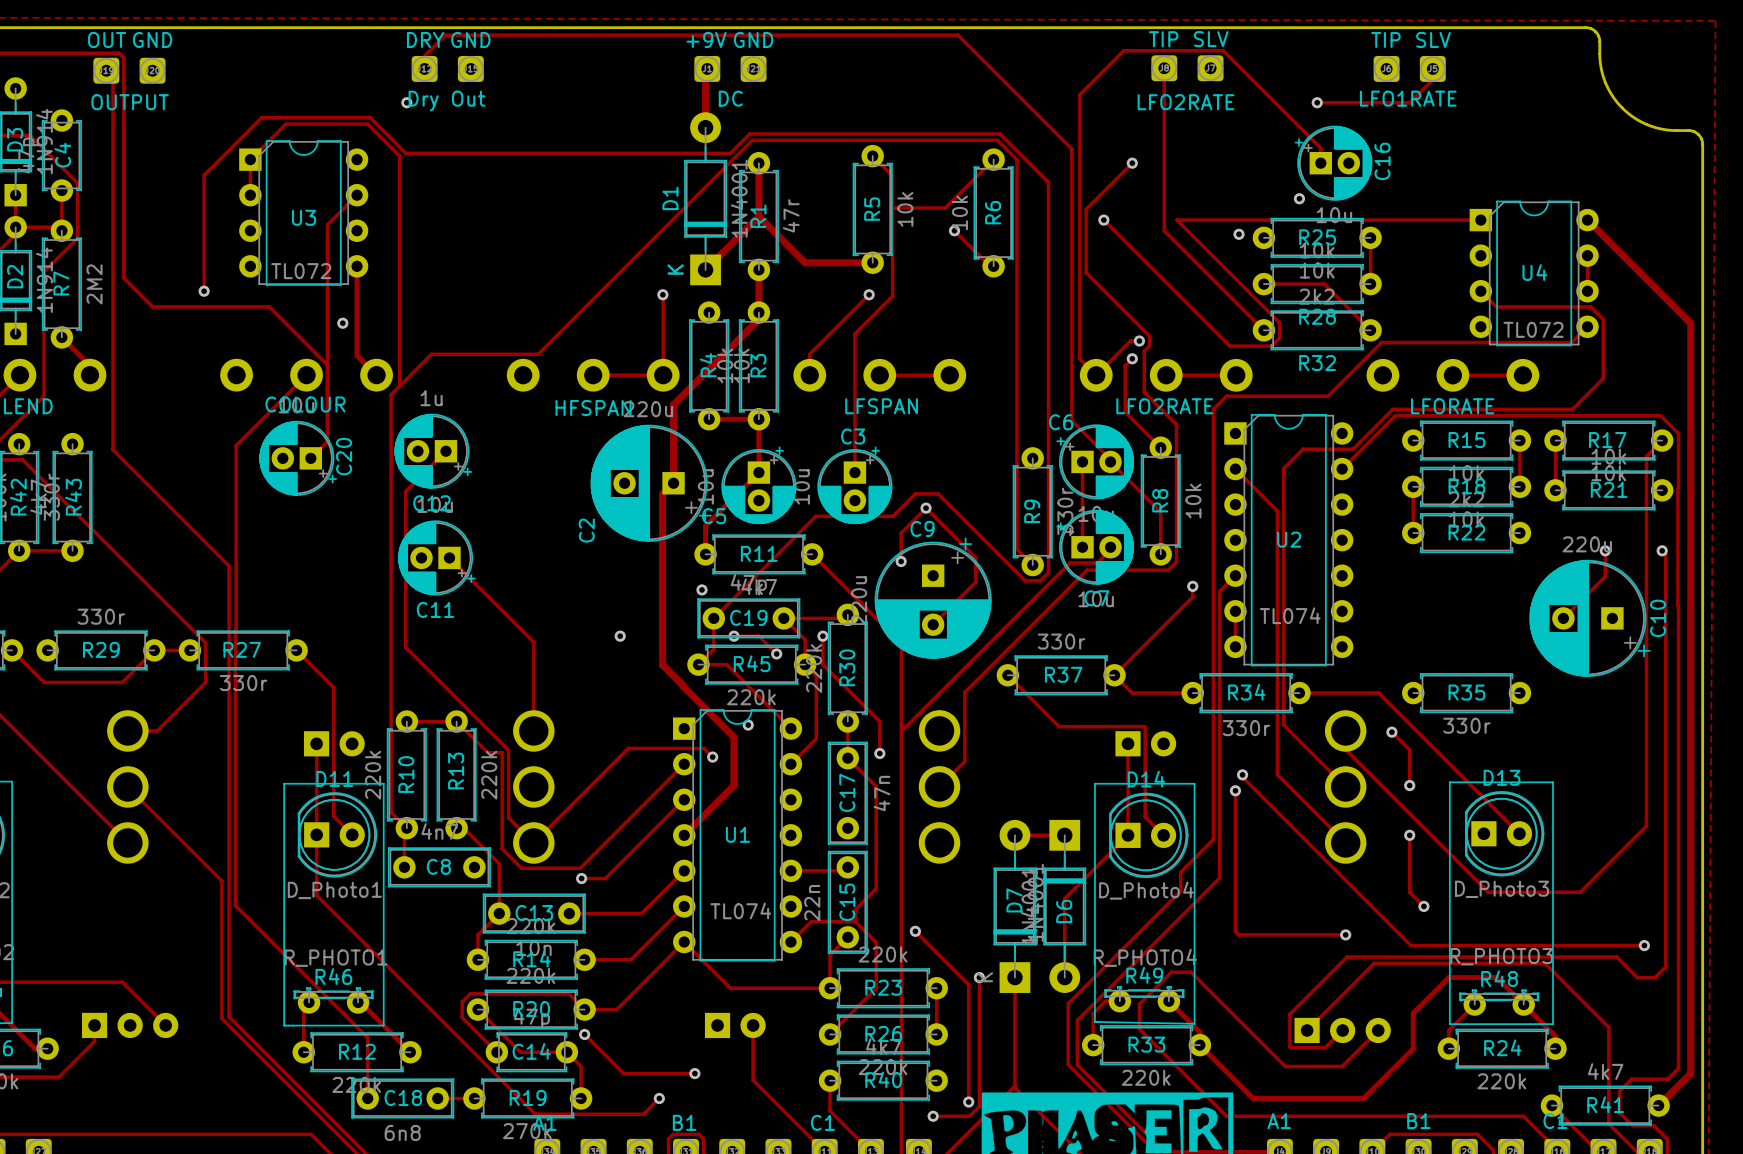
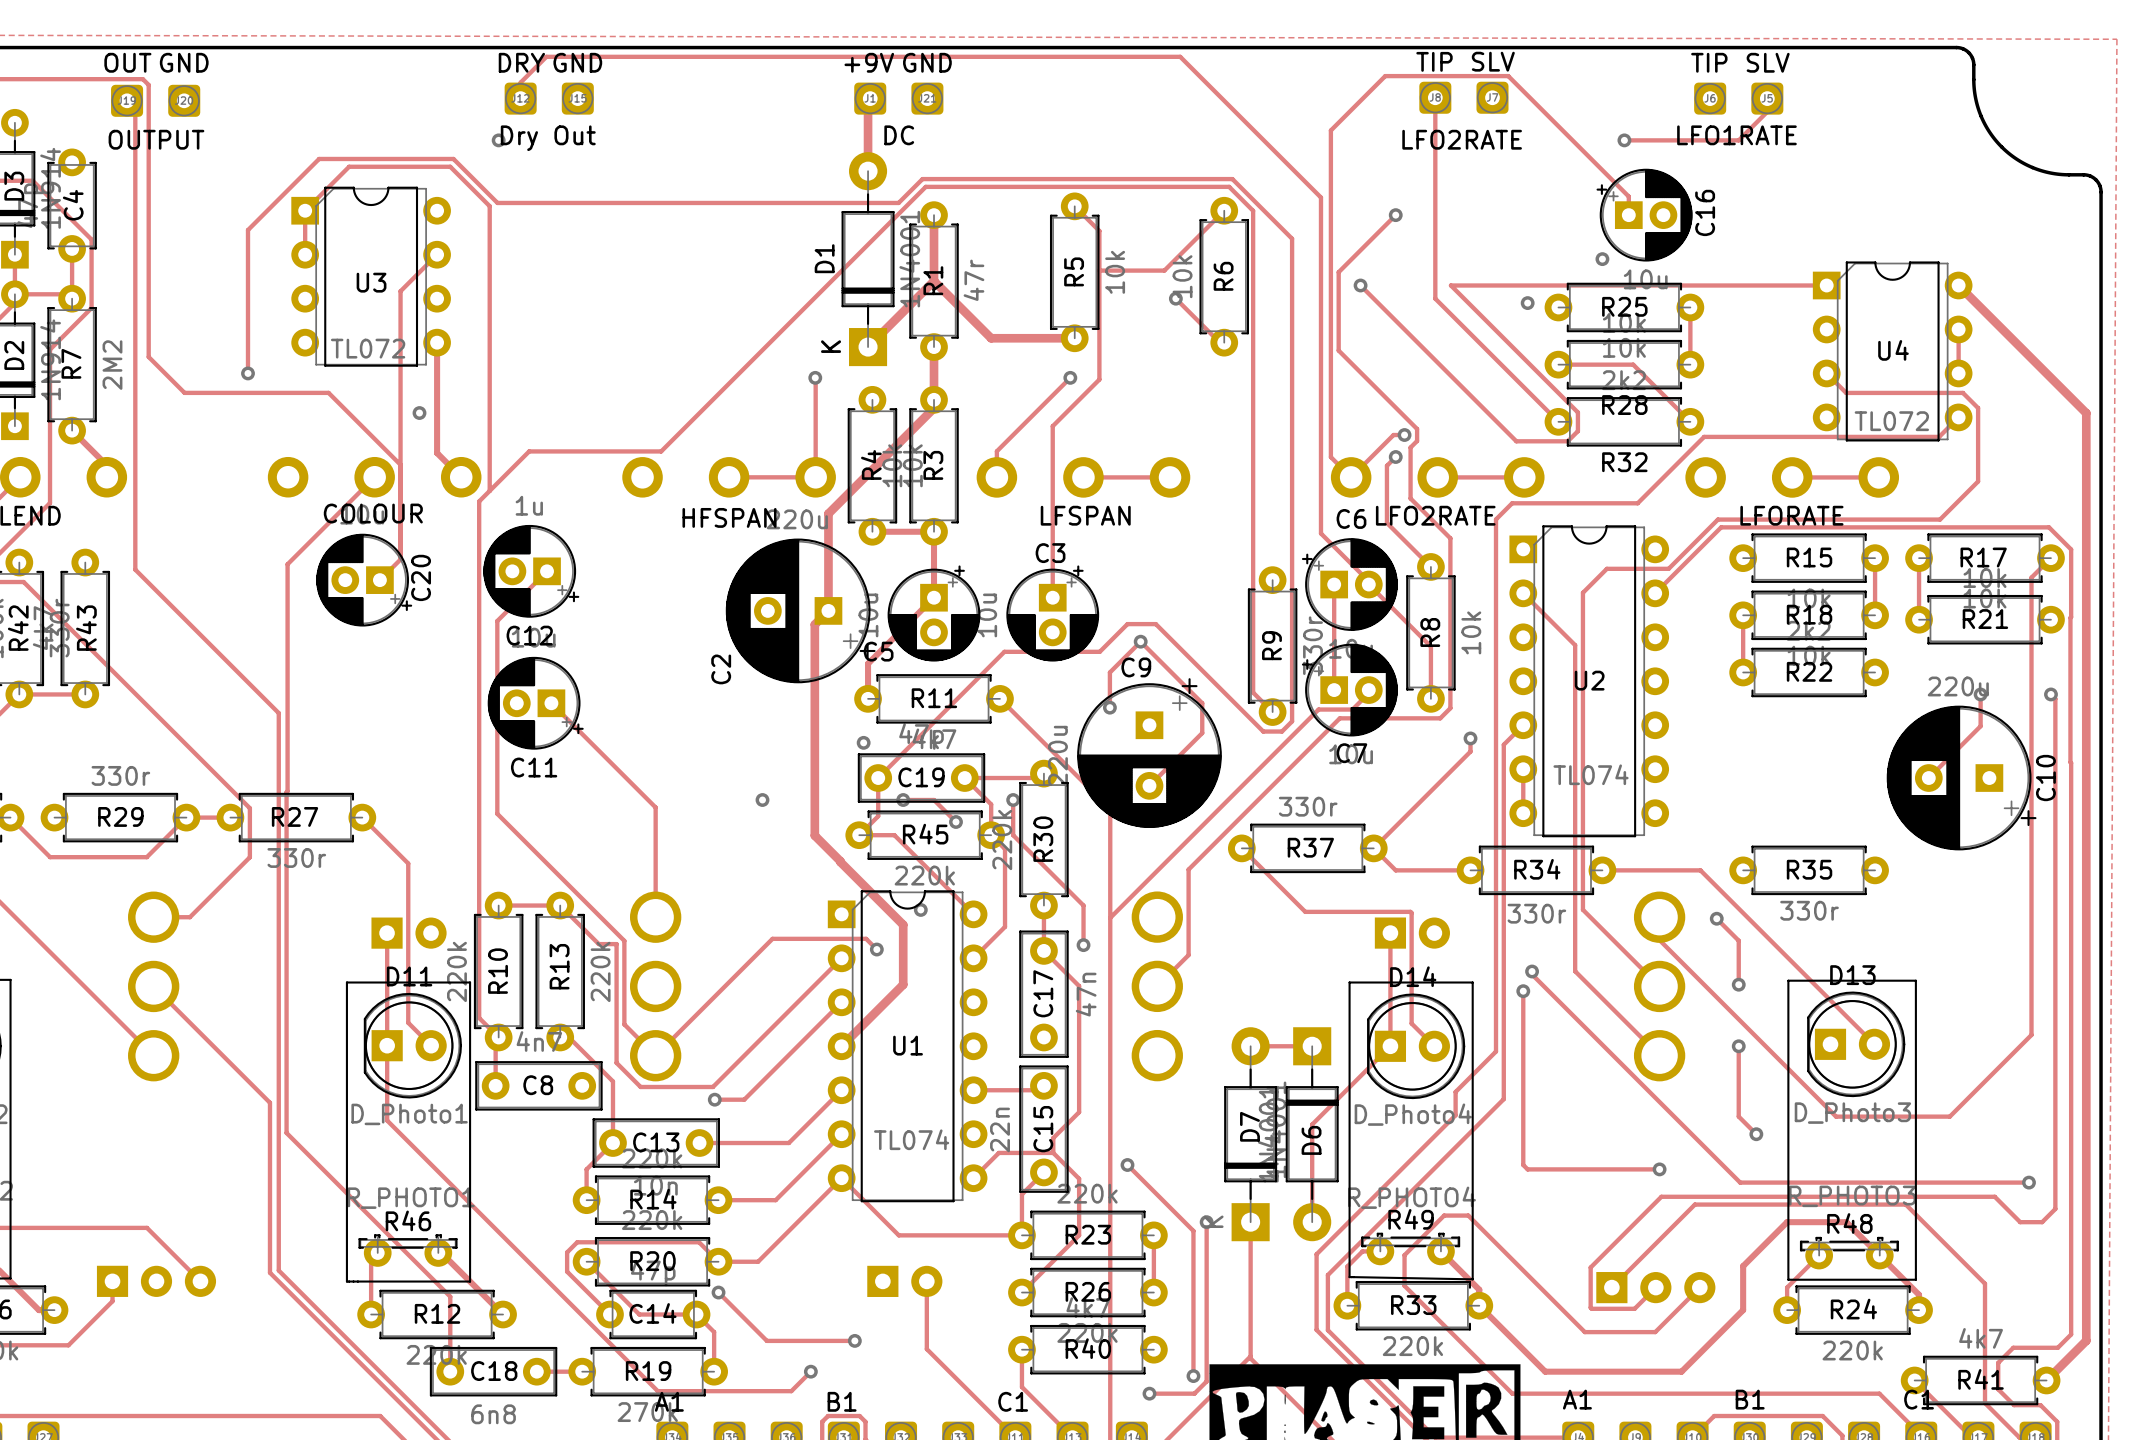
C6 name position: C6 (1061, 422) -> C6 (1351, 518)

